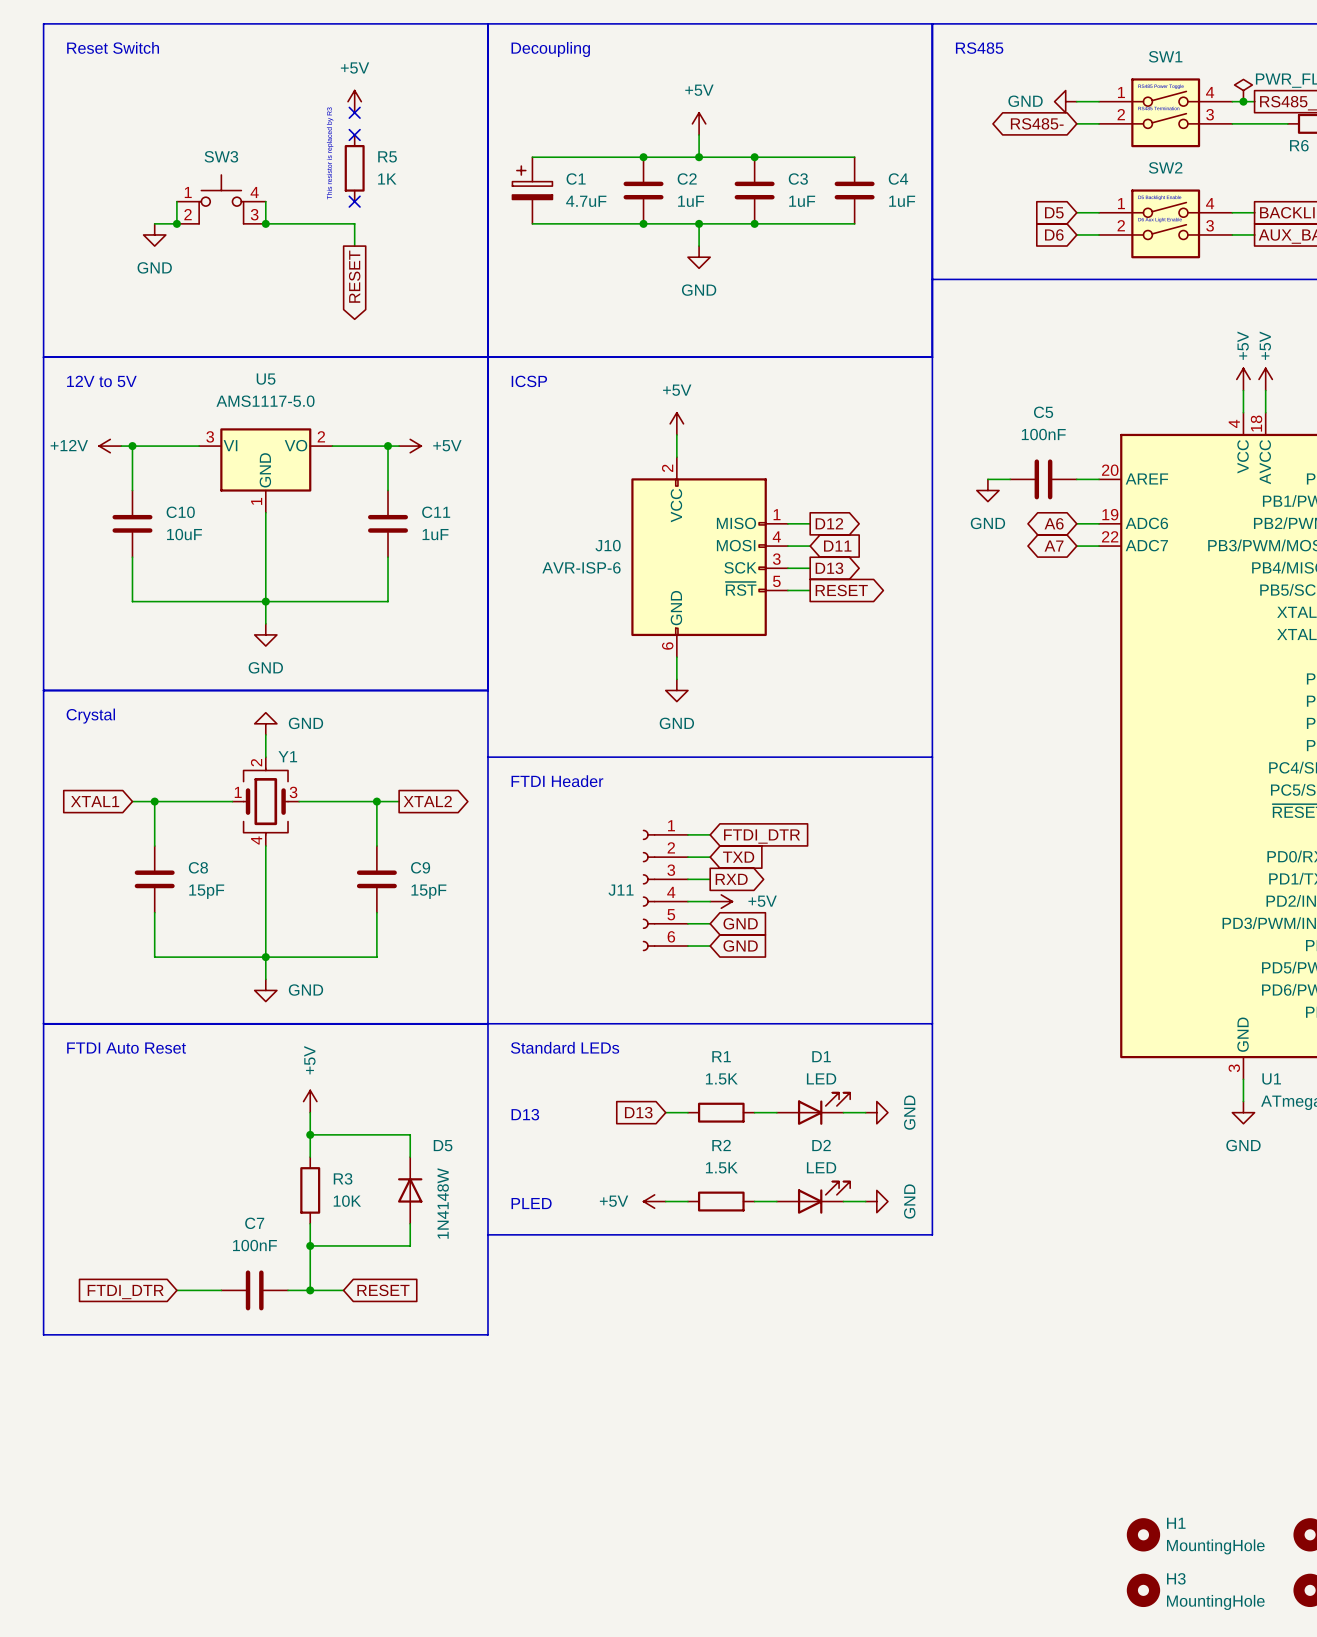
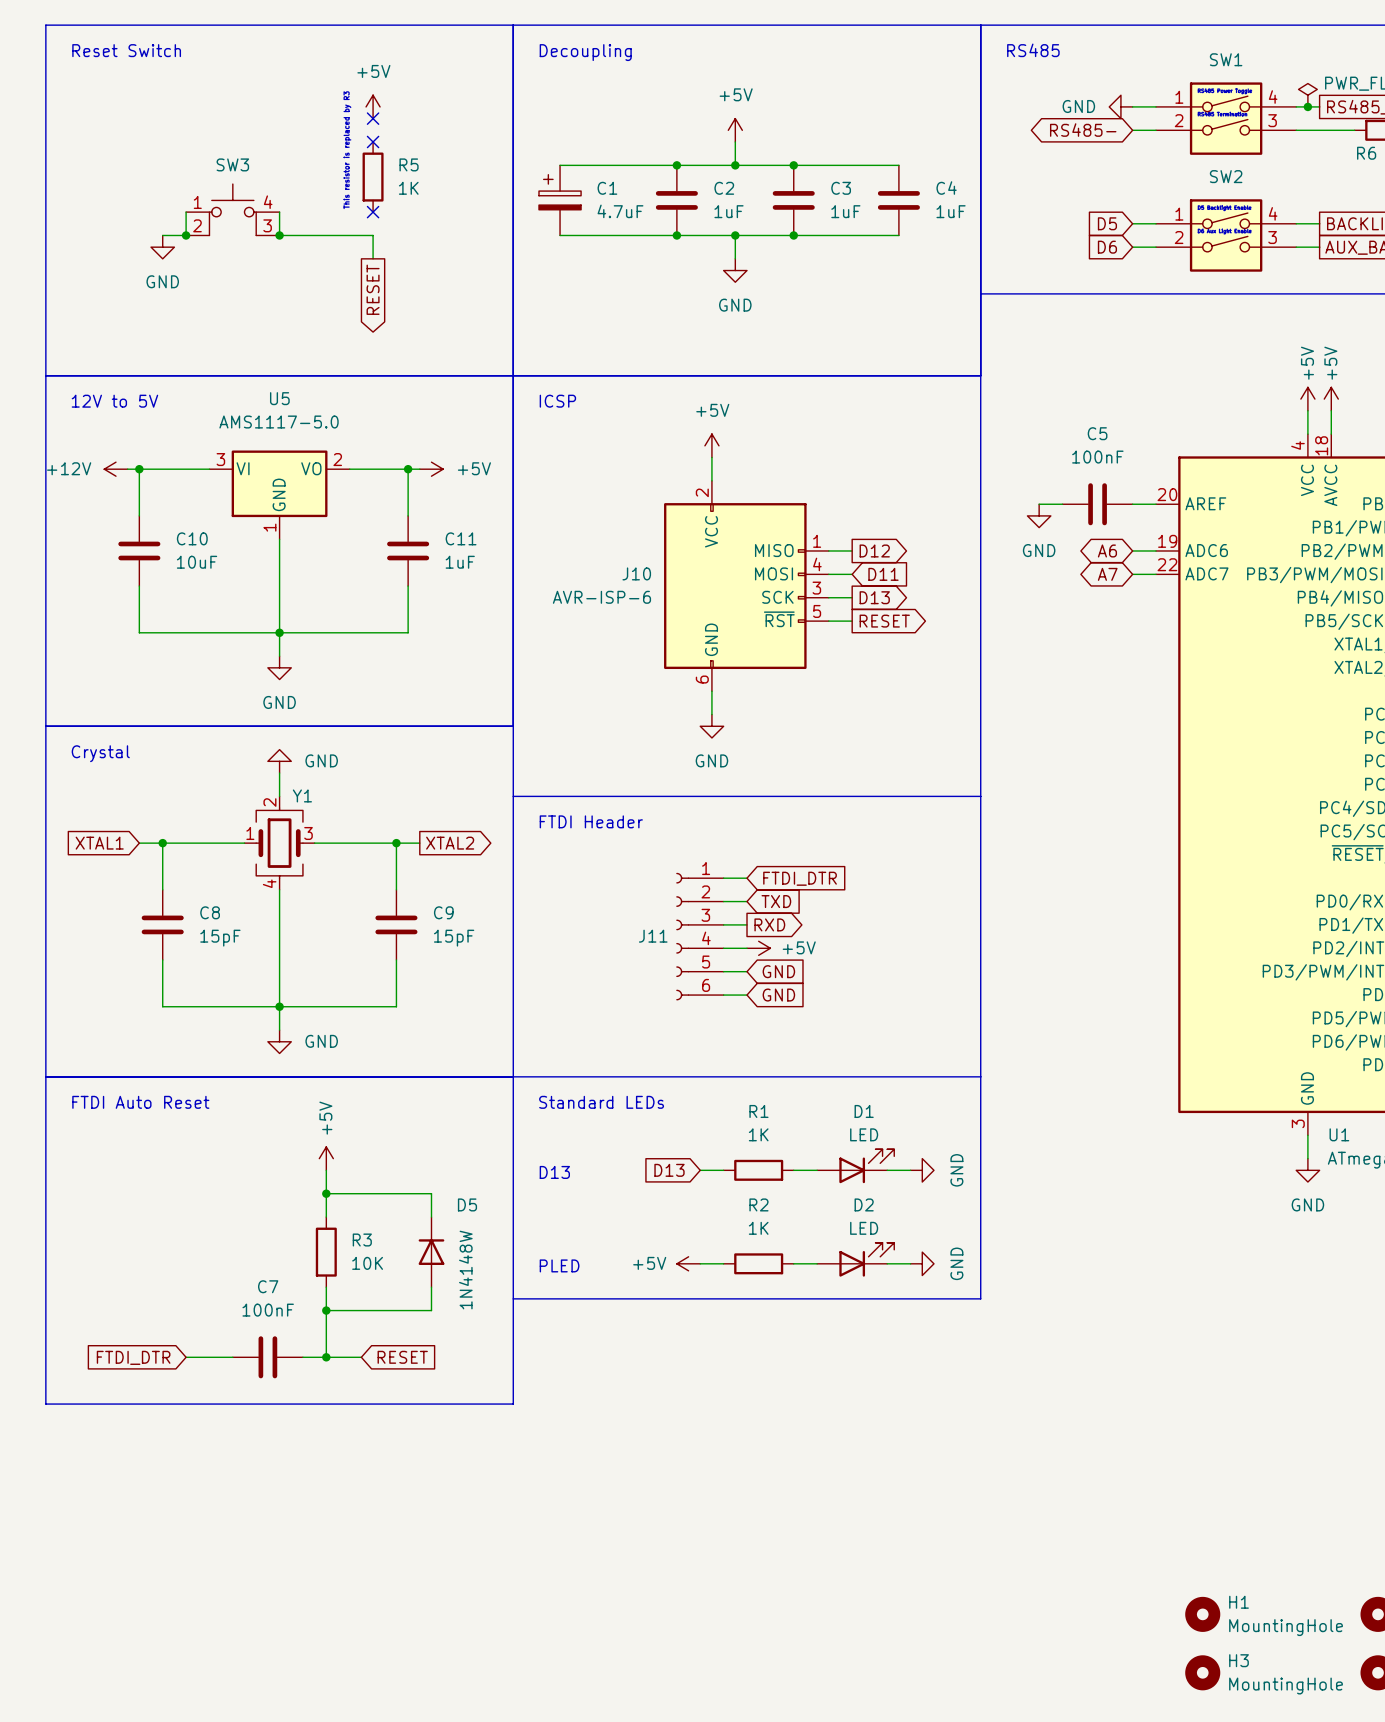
R1 value: 1.5K (721, 1078) -> 1K (758, 1134)
R2 value: 1.5K (721, 1167) -> 1K (758, 1228)

